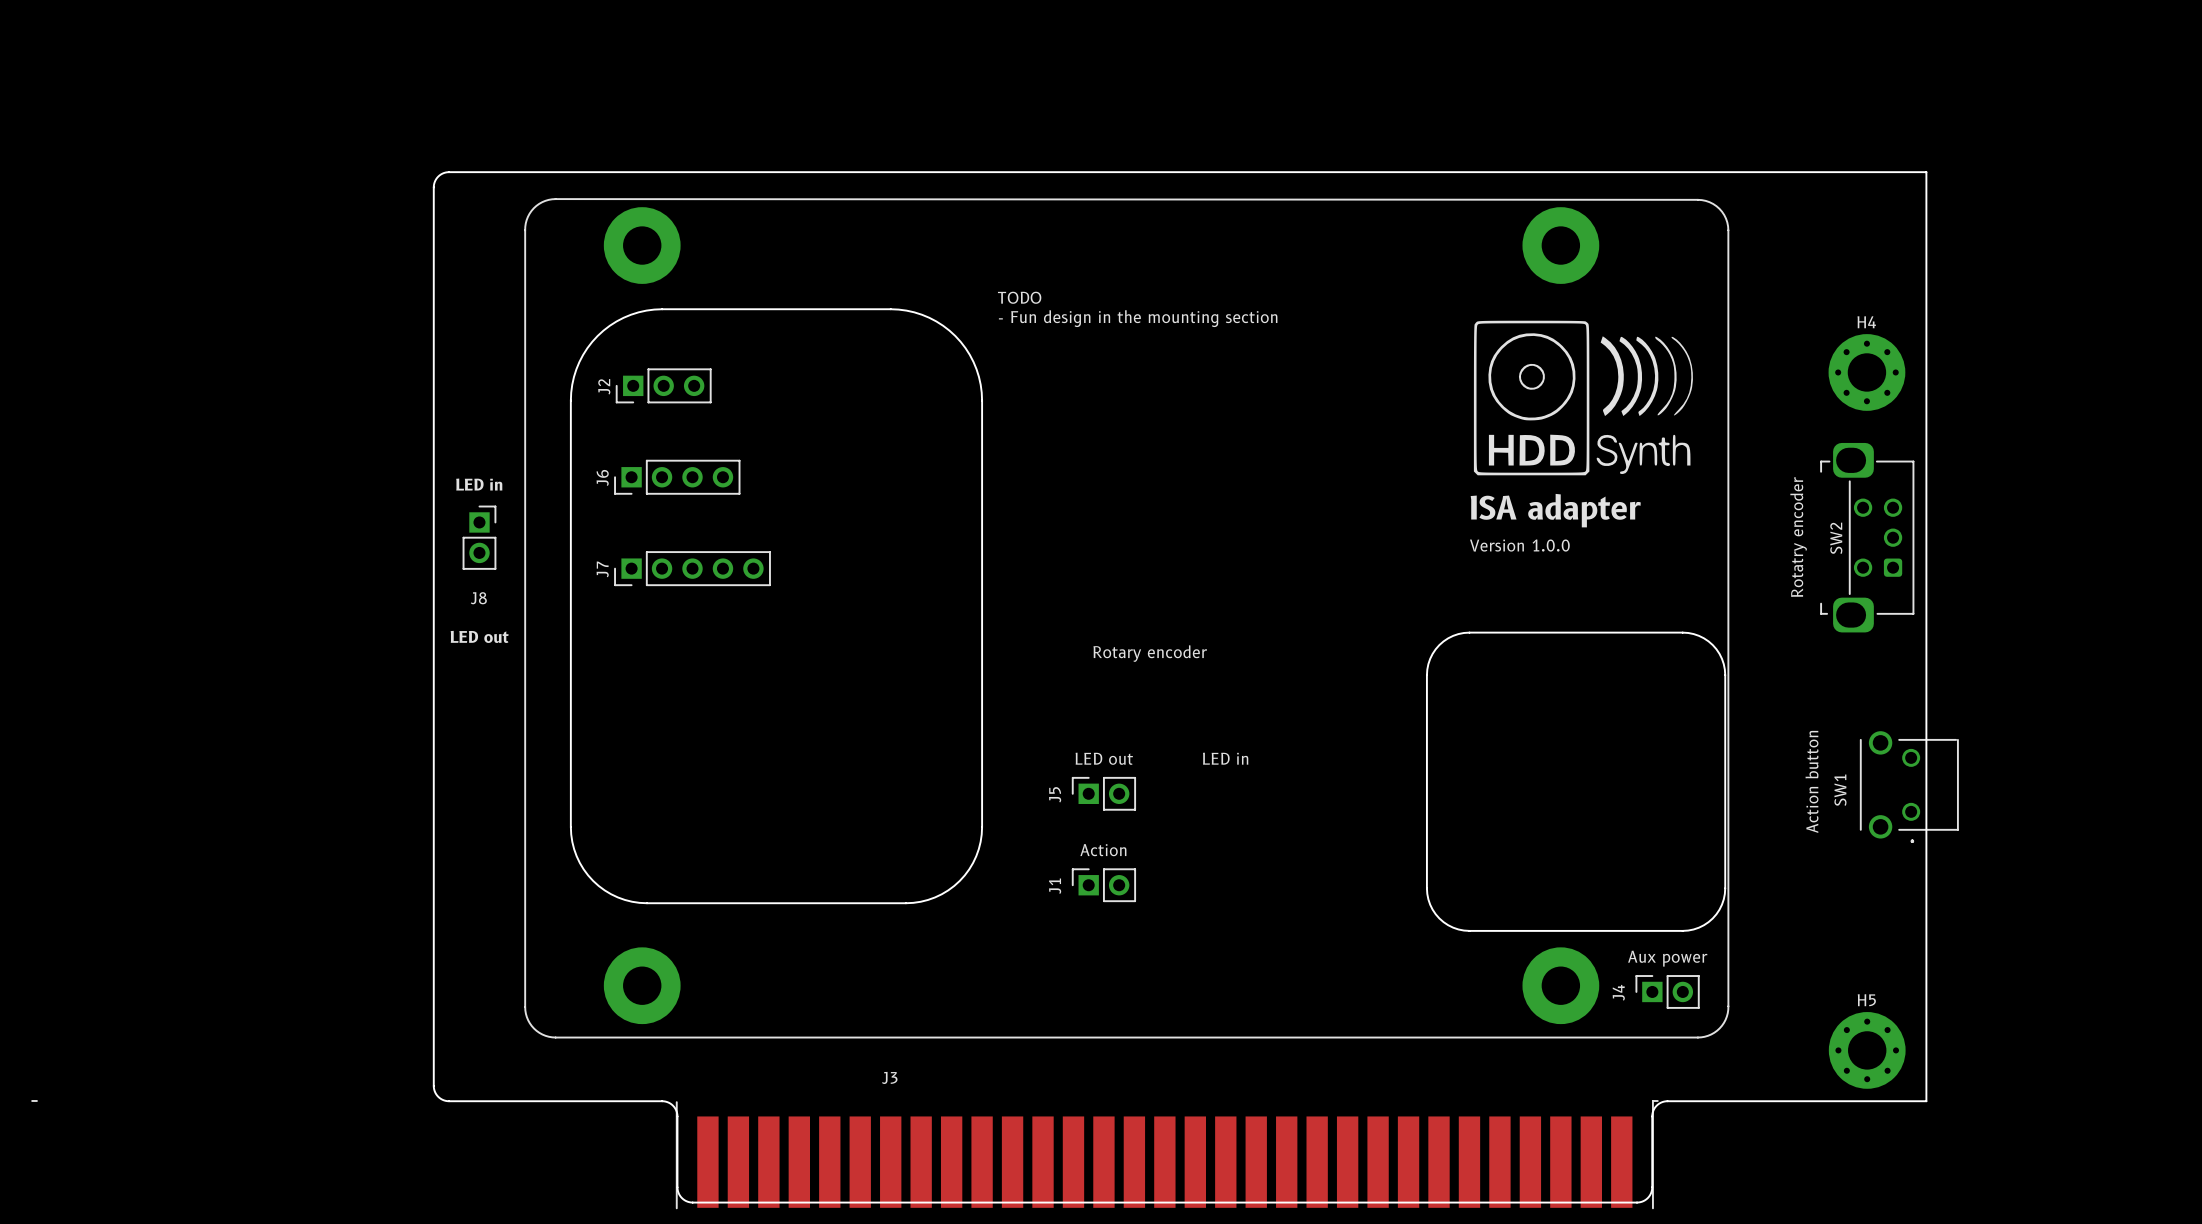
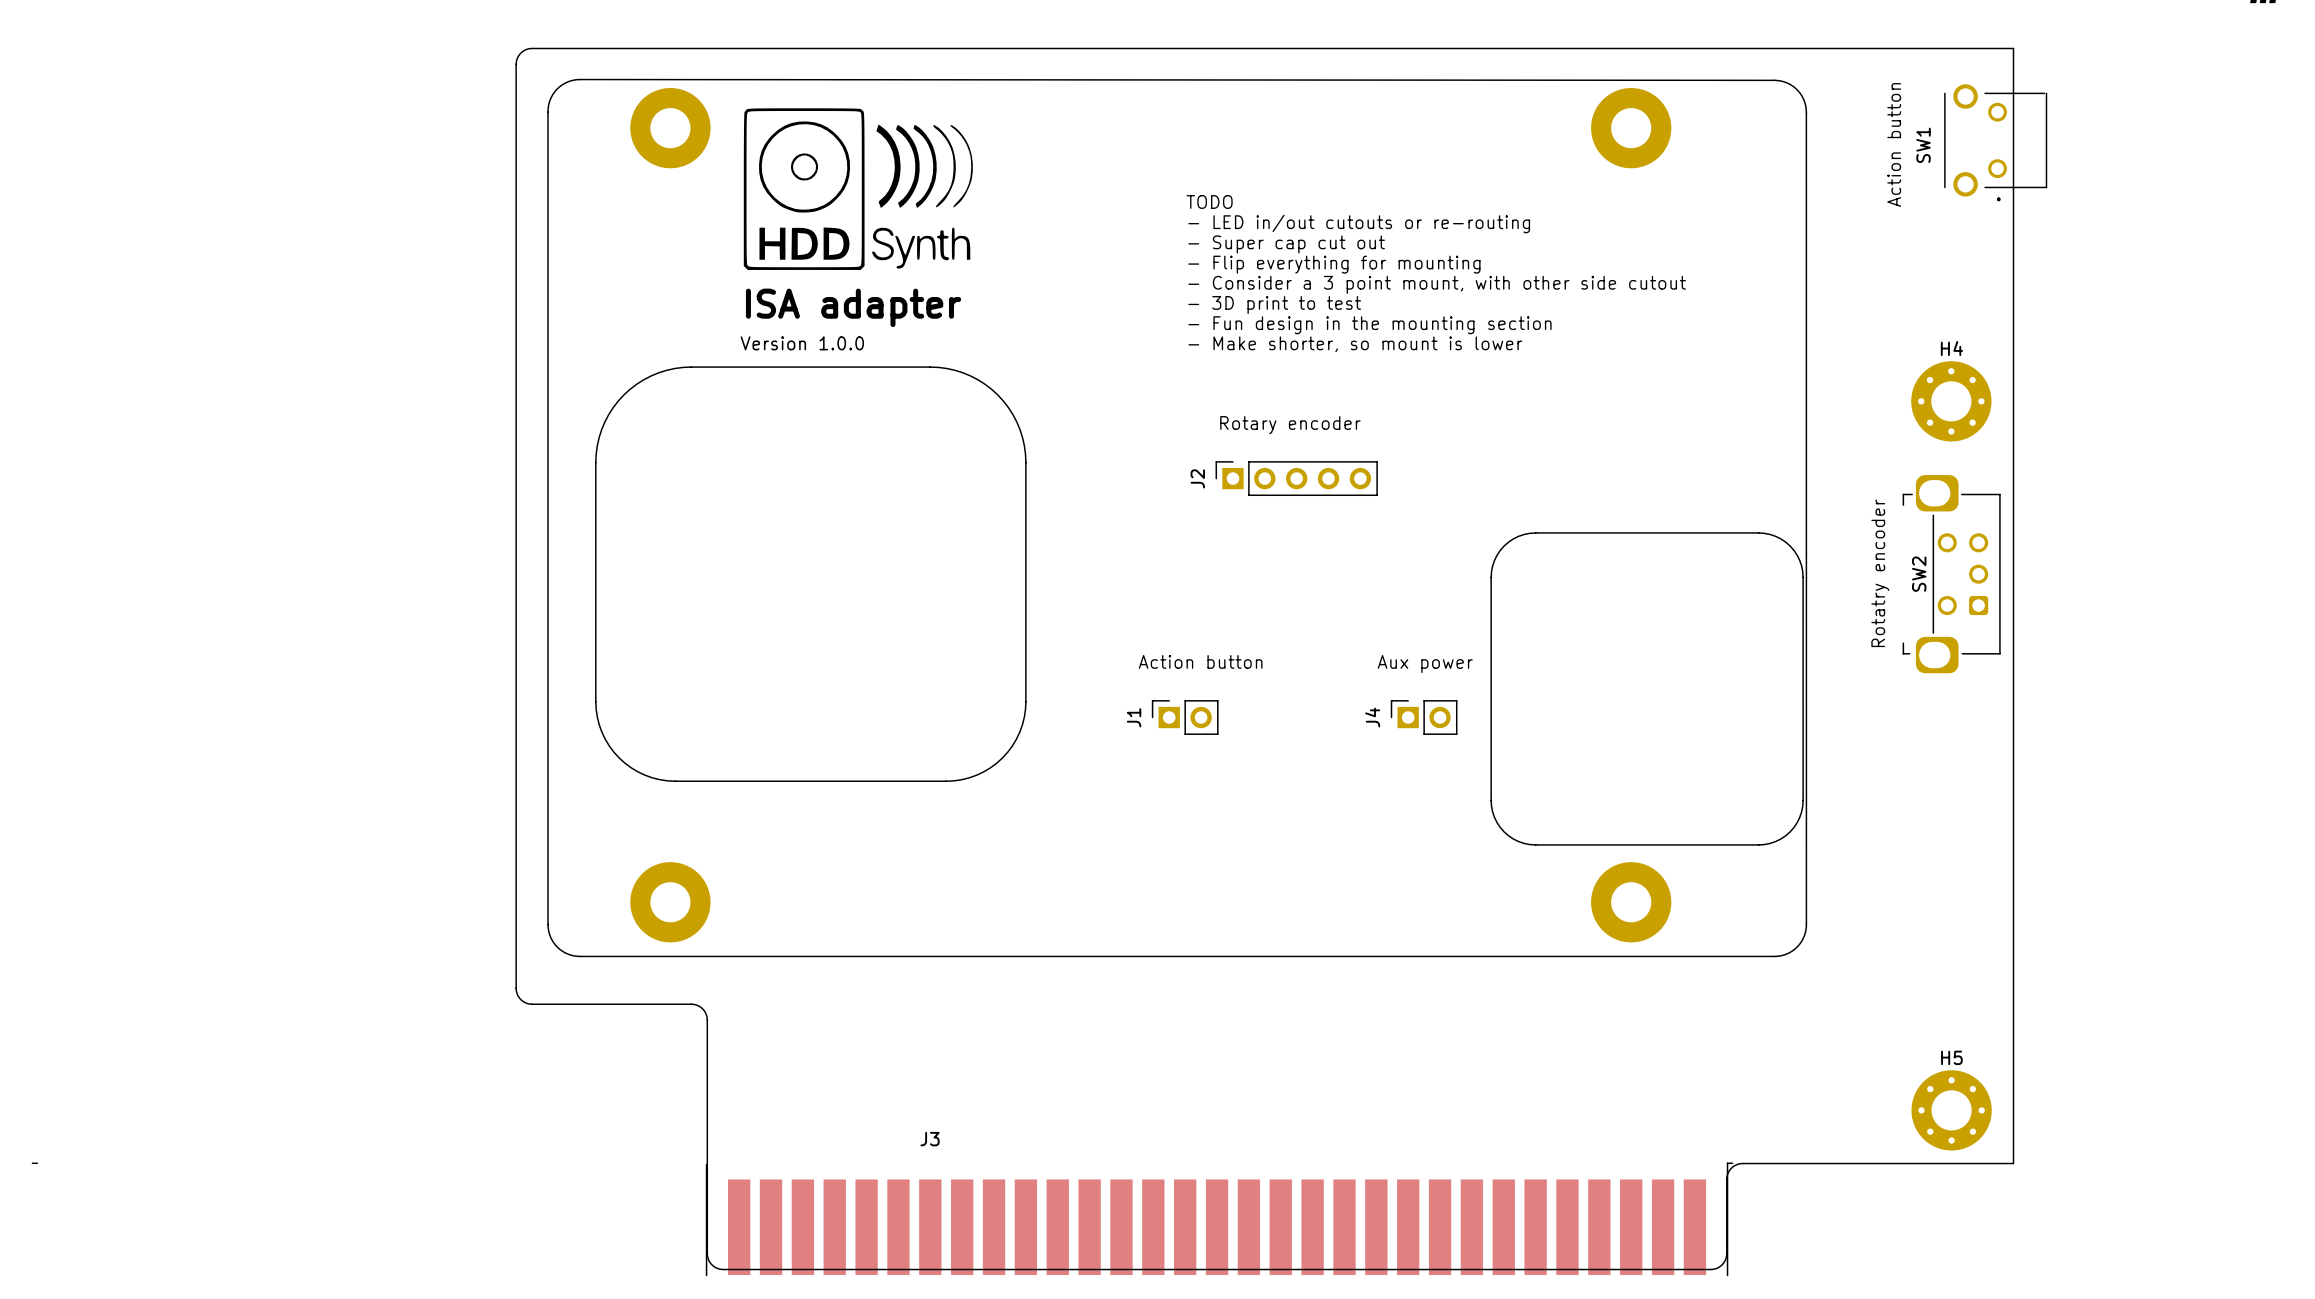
drawing: none -> [743, 108, 973, 270]
text: none -> Action button (1894, 144)
board edge: (1926, 172) (449, 172) (439, 175) (435, 180) (433, 187) (434, 1089) (439, 1097) (449, 1101) (663, 1101) (673, 1105) (677, 1116) -> (2013, 191) (2013, 48) (532, 48) (522, 51) (517, 57) (516, 64) (516, 990) (520, 999) (530, 1004) (691, 1004) (702, 1008) (707, 1020) (707, 1179)
text: none -> - LED in/out cutouts or re-routing (1359, 223)
text: none -> - Super cap cut out (1286, 244)
line: (525, 230) (526, 220) (533, 208) (542, 202) (555, 199) (1697, 199) (1709, 202) (1719, 208) (1726, 218) (1728, 230) -> (548, 252) (548, 104) (552, 94) (559, 86) (569, 81) (579, 79) (1778, 80) (1786, 82) (1797, 89) (1802, 96) (1806, 108) (1806, 252)
text: none -> - Flip everything for mounting (1334, 264)
part position: (642, 245) -> (670, 128)
part position: (1560, 245) -> (1631, 128)
text: none -> - Consider a 3 point mount, with other side cutout (1437, 284)
text: none -> - 3D print to test (1274, 305)
text: none -> ISA adapter (853, 307)
text position: TODO (1019, 297) -> TODO (1209, 201)
text: none -> Version 1.0.0 (802, 343)
text: none -> - Make shorter, so mount is lower (1355, 344)
text position: - Fun design in the mounting section (1138, 318) -> - Fun design in the mounting section (1369, 325)
drawing: [1473, 320, 1693, 476] -> none
J2 footprint: [615, 368, 712, 404] -> [1215, 461, 1378, 497]
J2 name position: J2 (604, 386) -> J2 (1197, 478)
board edge: (570, 431) (572, 384) (576, 369) (587, 348) (603, 330) (616, 321) (638, 312) (662, 309) (890, 309) (921, 314) (943, 325) (955, 336) (973, 361) (981, 392) (982, 431) -> (595, 462) (601, 429) (608, 414) (623, 395) (650, 376) (674, 368) (691, 367) (930, 367) (955, 370) (985, 384) (1008, 407) (1022, 437) (1025, 462)
J6: (677, 477) -> none
text: LED in (479, 484) -> none
text: ISA adapter (1555, 510) -> none
J8: (479, 537) -> none
text: Version 1.0.0 (1519, 545) -> none
J7: (692, 568) -> none
text: none -> Action button (1200, 661)
text: none -> Aux power (1425, 664)
text: LED out (479, 636) -> none
text position: Rotary encoder (1150, 653) -> Rotary encoder (1290, 425)
board edge: (570, 659) (570, 827) (574, 849) (583, 869) (604, 890) (624, 899) (647, 903) (905, 903) (928, 899) (948, 890) (969, 869) (978, 849) (981, 834) (982, 659) -> (595, 701) (597, 717) (601, 732) (609, 745) (619, 757) (631, 767) (644, 775) (659, 779) (675, 781) (961, 779) (976, 775) (990, 767) (1007, 752) (1019, 732) (1024, 717) (1025, 701)
board edge: (1426, 675) (1430, 658) (1439, 645) (1453, 635) (1469, 632) (1688, 632) (1703, 638) (1712, 645) (1722, 658) (1725, 675) -> (1491, 717) (1492, 565) (1500, 550) (1508, 542) (1524, 534) (1535, 532) (1758, 532) (1775, 536) (1785, 542) (1797, 555) (1802, 571) (1803, 717)
board edge: (1426, 754) (1428, 899) (1435, 914) (1443, 922) (1453, 927) (1469, 930) (1682, 930) (1693, 929) (1708, 922) (1719, 909) (1724, 893) (1725, 754) -> (1491, 800) (1494, 817) (1504, 831) (1518, 841) (1535, 844) (1764, 844) (1780, 838) (1793, 827) (1801, 811) (1803, 800)
text: LED out (1104, 758) -> none
text: LED in (1225, 758) -> none
text: Action button (1811, 781) -> none
SW1 position: (1909, 787) -> (1995, 142)
J5: (1103, 793) -> none
text: Action (1103, 850) -> none
line: (1728, 871) (1727, 1013) (1723, 1022) (1717, 1030) (1708, 1035) (1697, 1037) (552, 1037) (542, 1034) (534, 1028) (528, 1020) (525, 1010) (525, 872) -> (1806, 923) (1804, 934) (1797, 946) (1785, 954) (1774, 956) (579, 956) (566, 953) (557, 947) (551, 938) (548, 924)
J1 position: (1103, 885) -> (1185, 717)
text: Aux power (1667, 958) -> none
part position: (642, 985) -> (670, 902)
part position: (1560, 985) -> (1631, 902)
J4 position: (1667, 991) -> (1424, 717)

